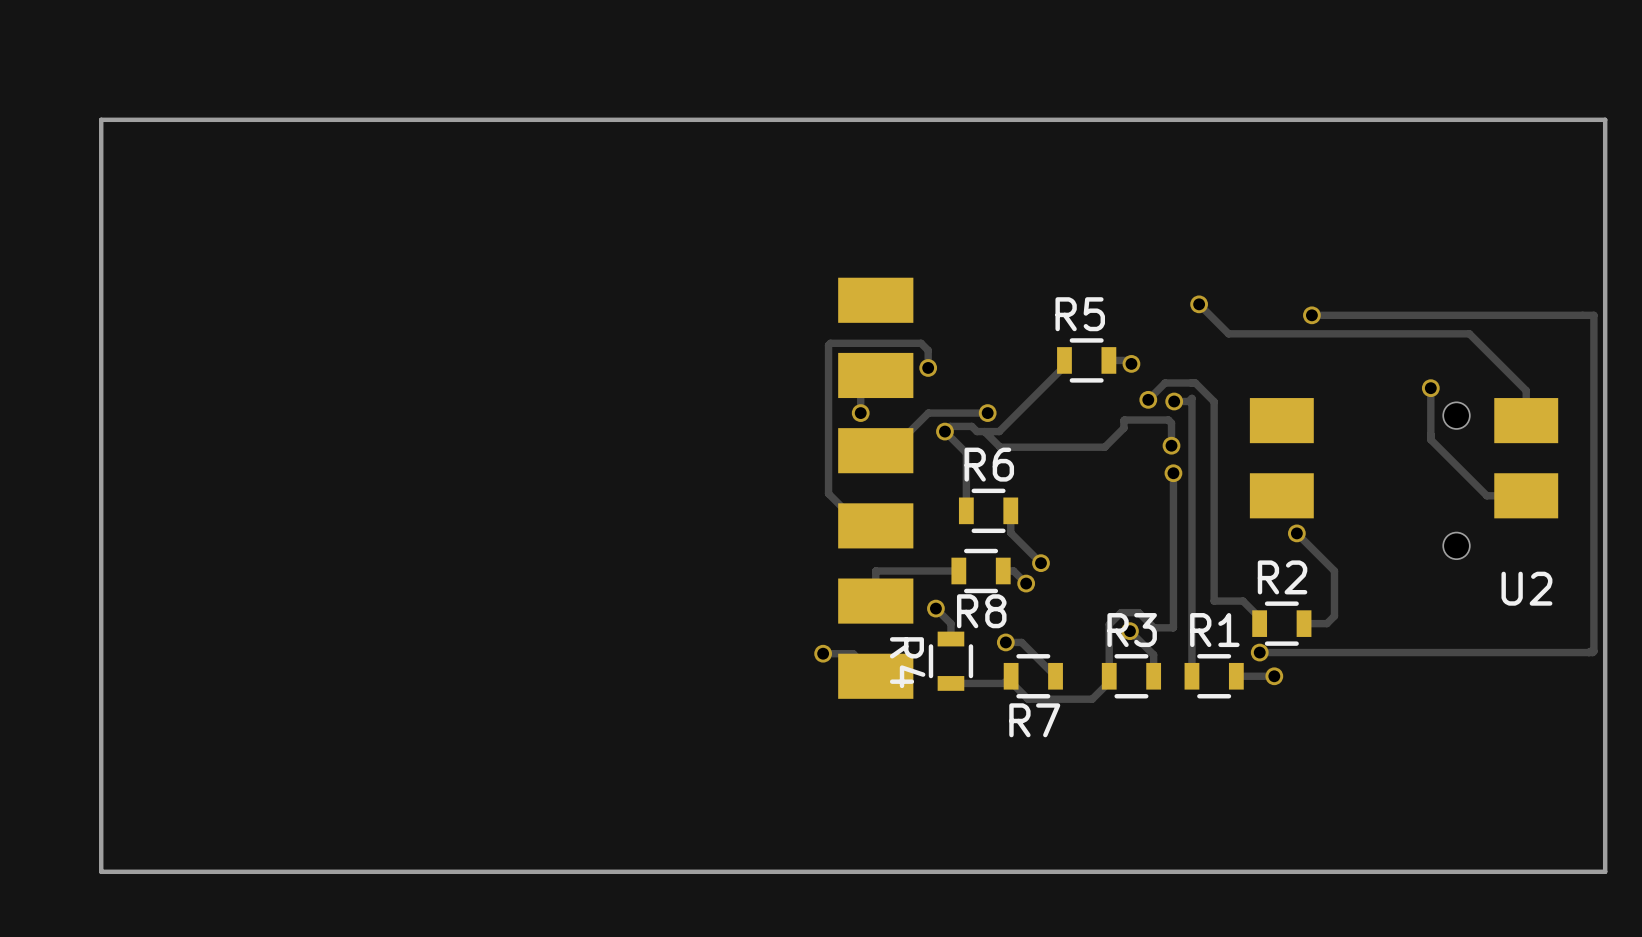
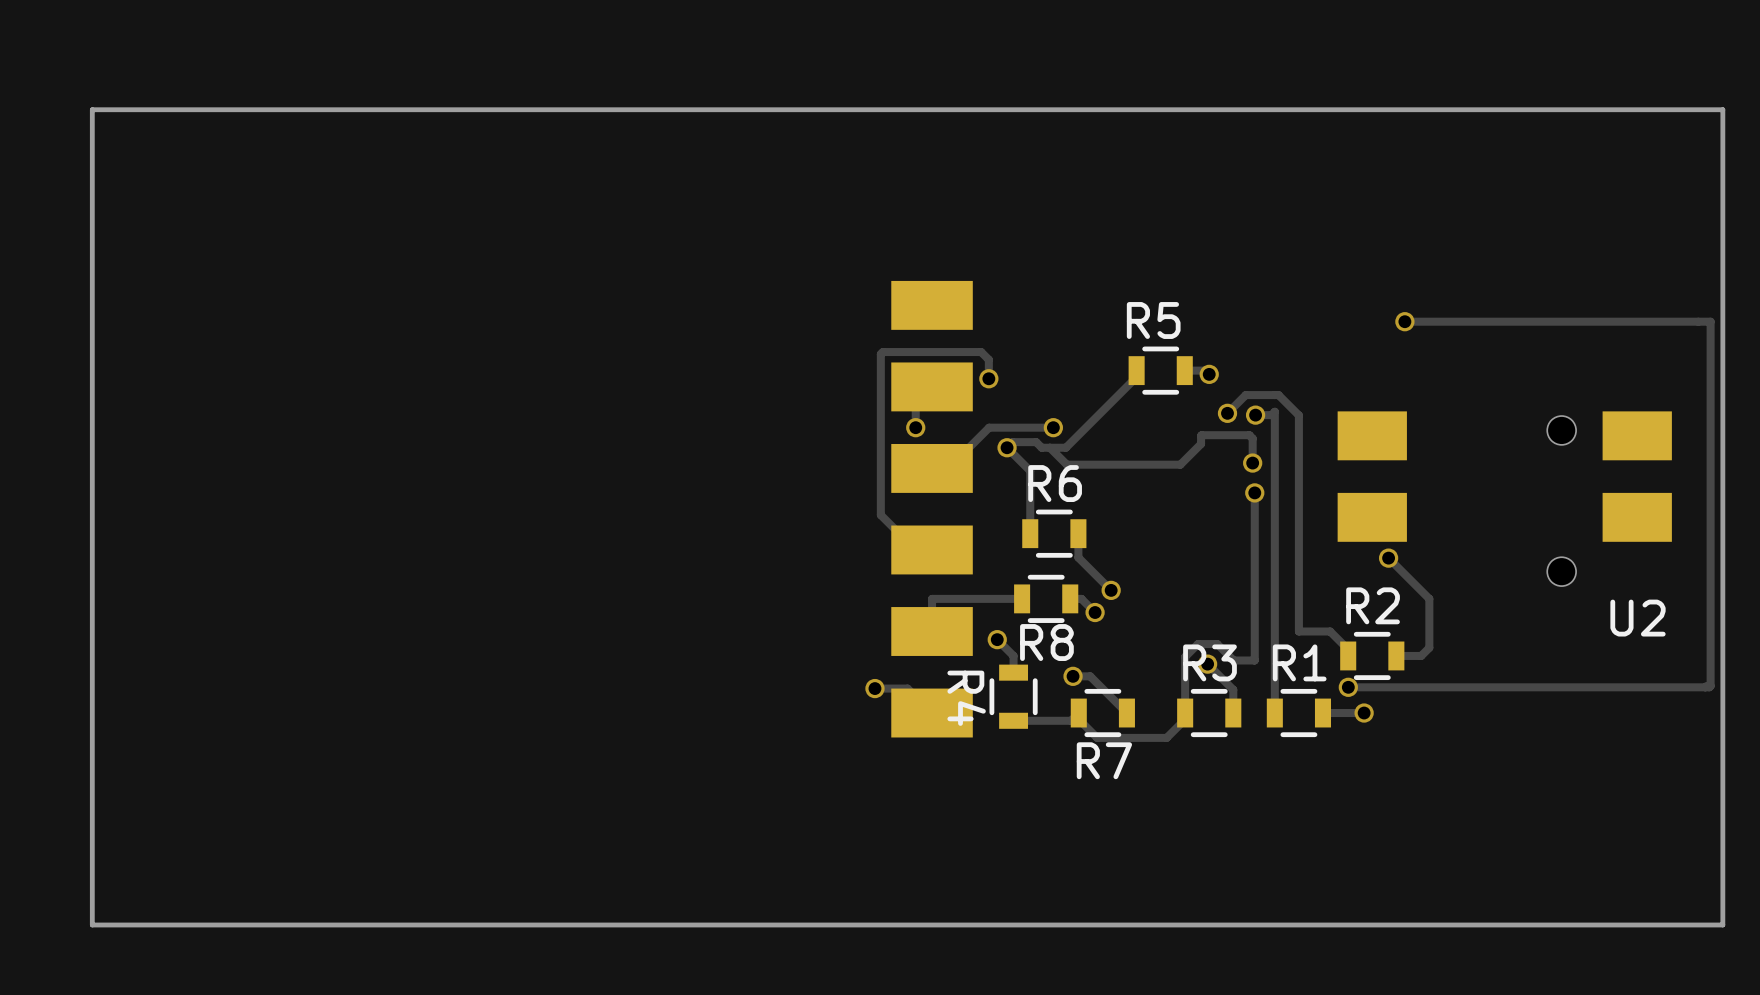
track: (1199, 304) (1228, 333) (1469, 333) (1526, 390) (1526, 420) -> none
via: (1199, 304) -> none
track: (1430, 388) (1430, 439) (1486, 495) (1526, 495) -> none
via: (1430, 388) -> none

